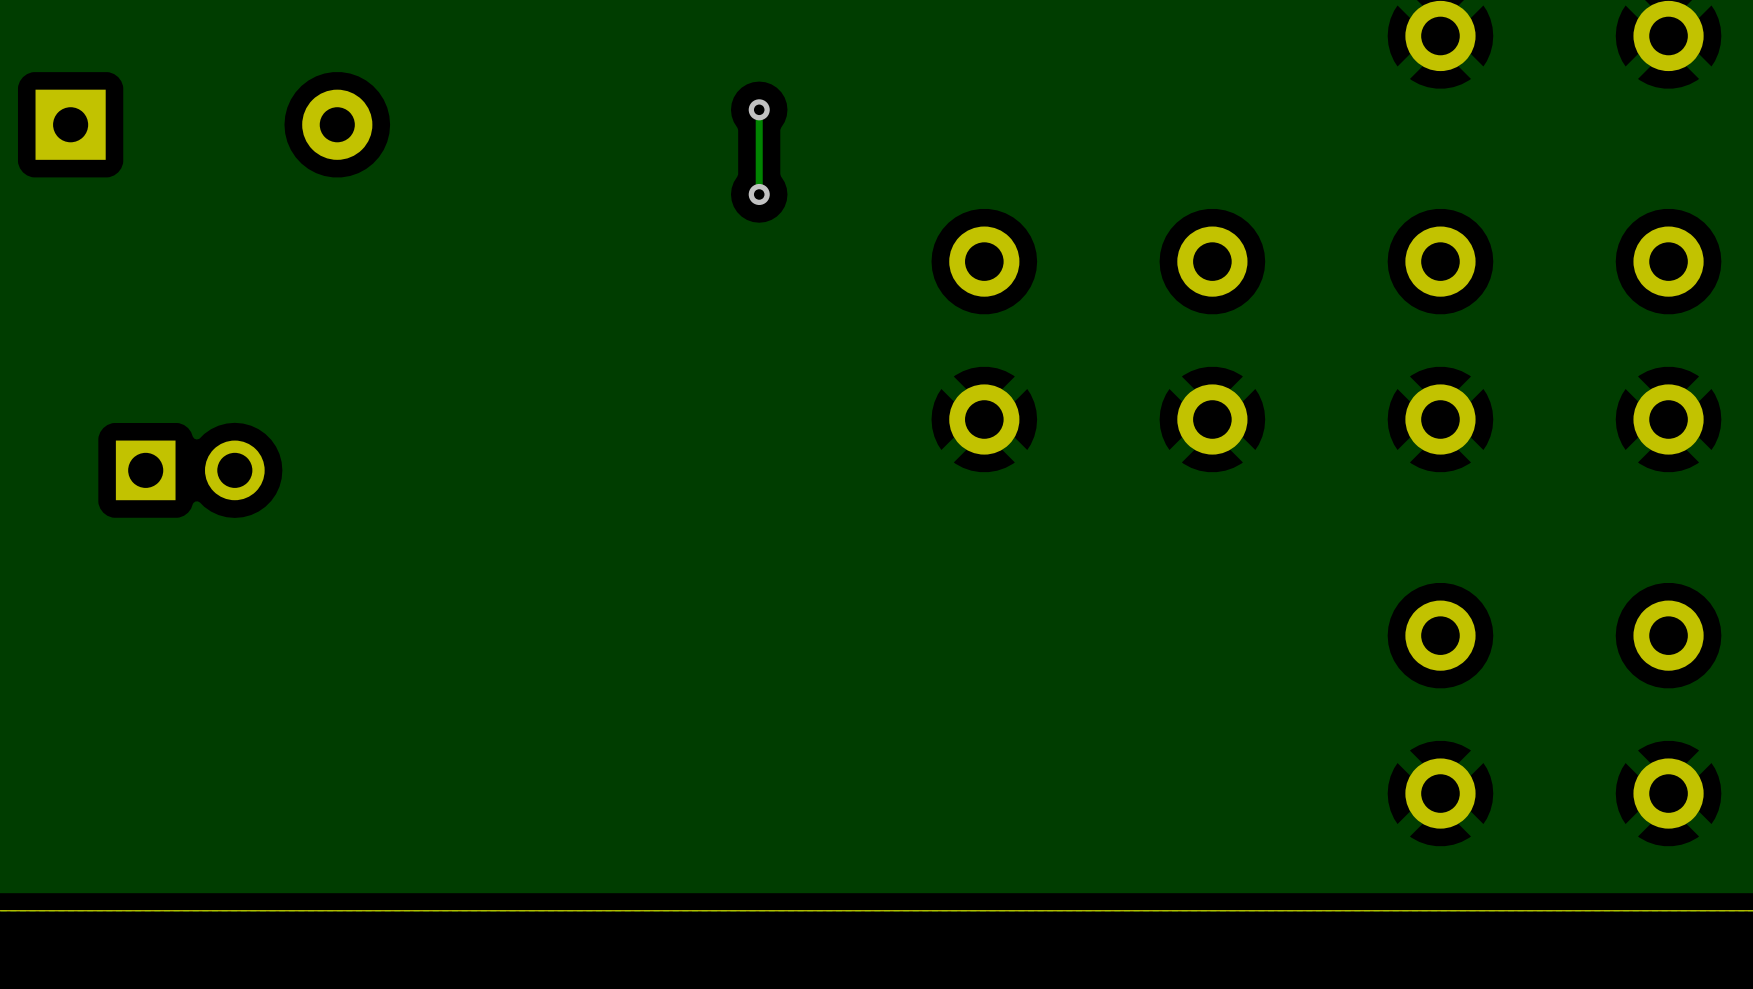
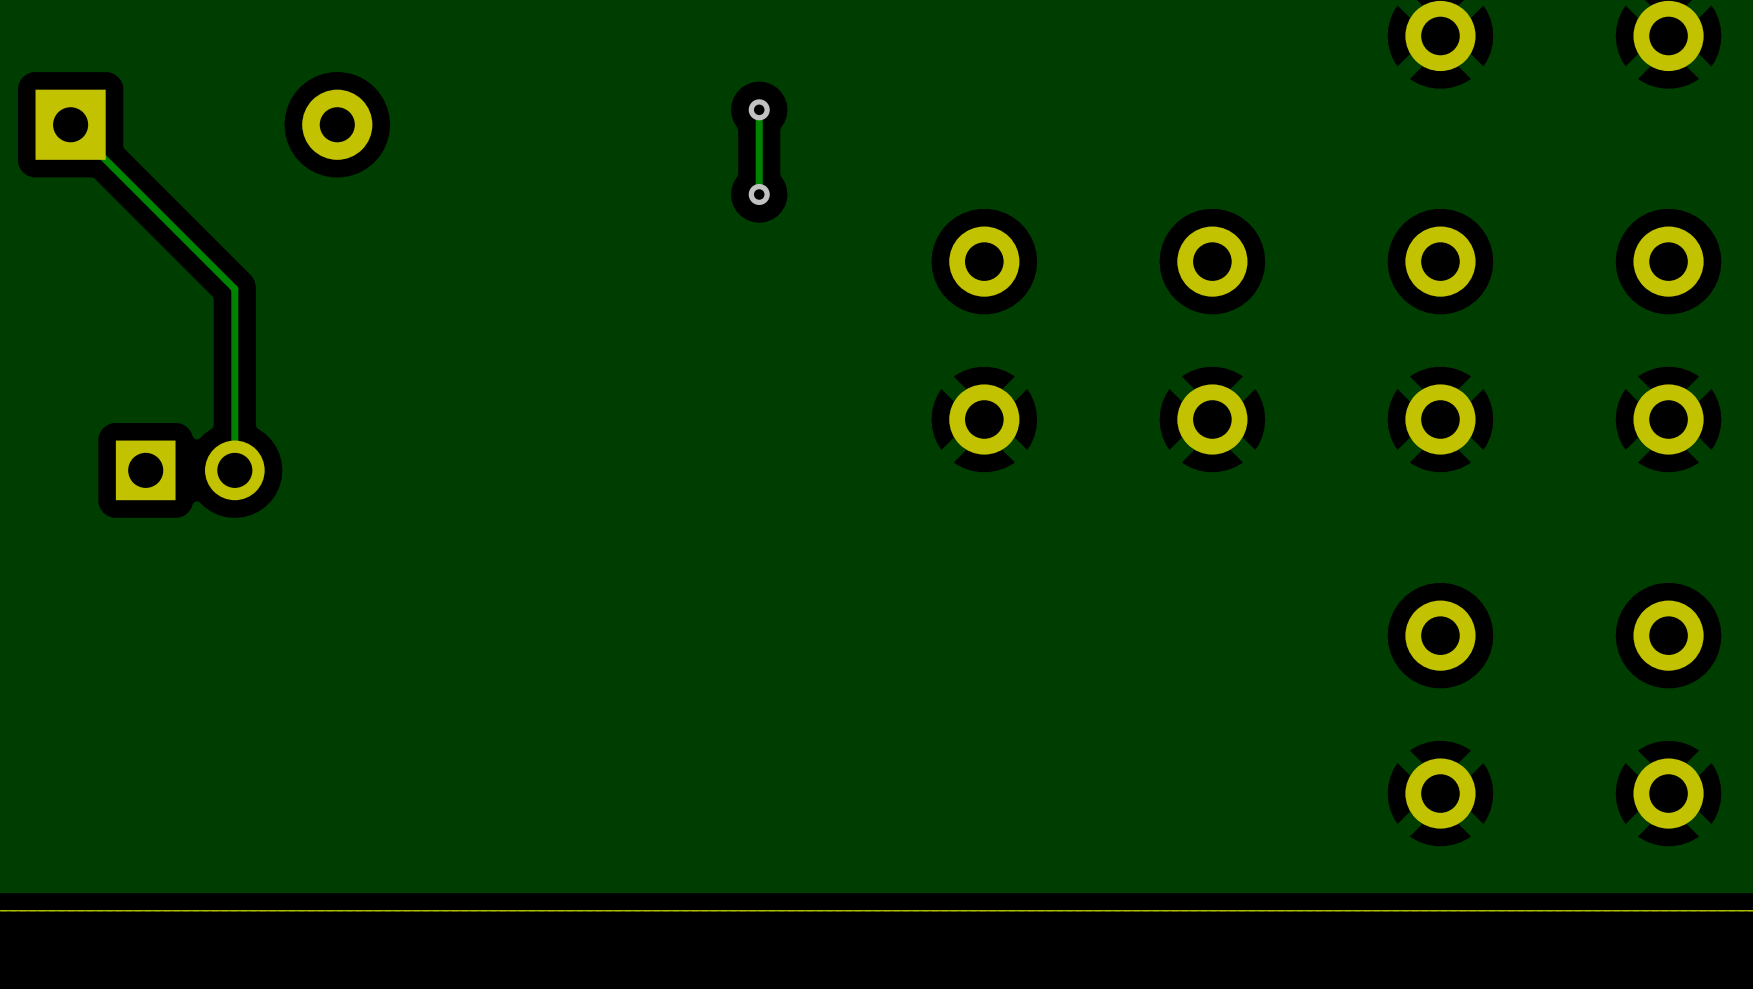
track: none -> (70, 124) (234, 288) (234, 470)

